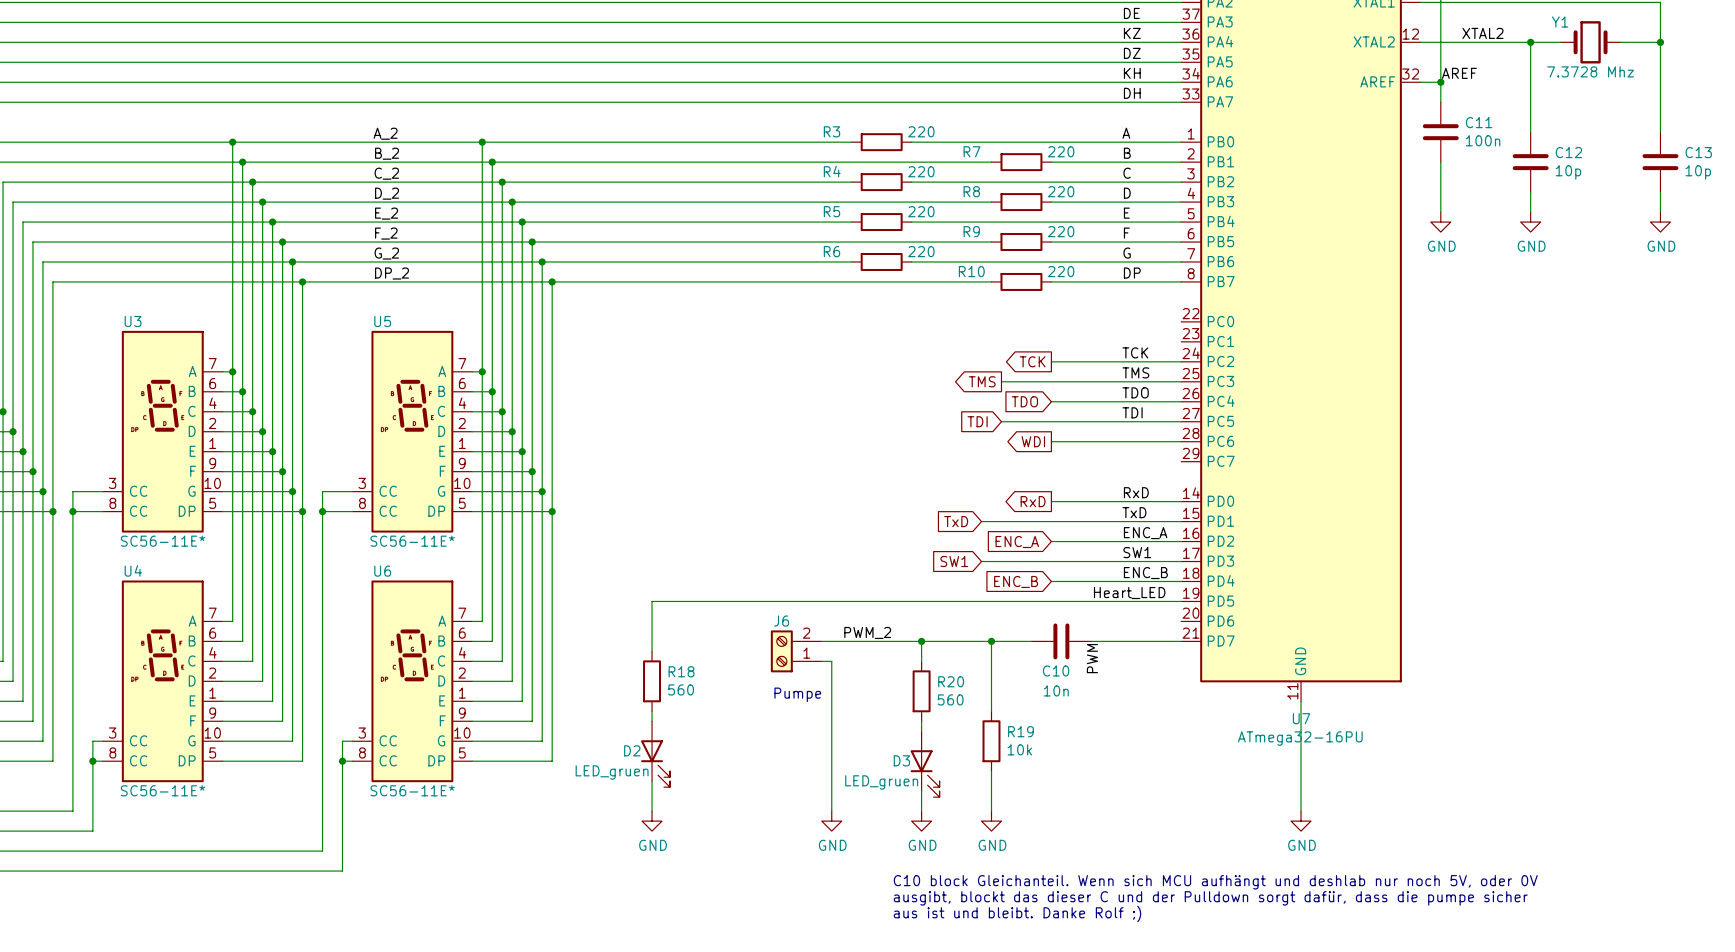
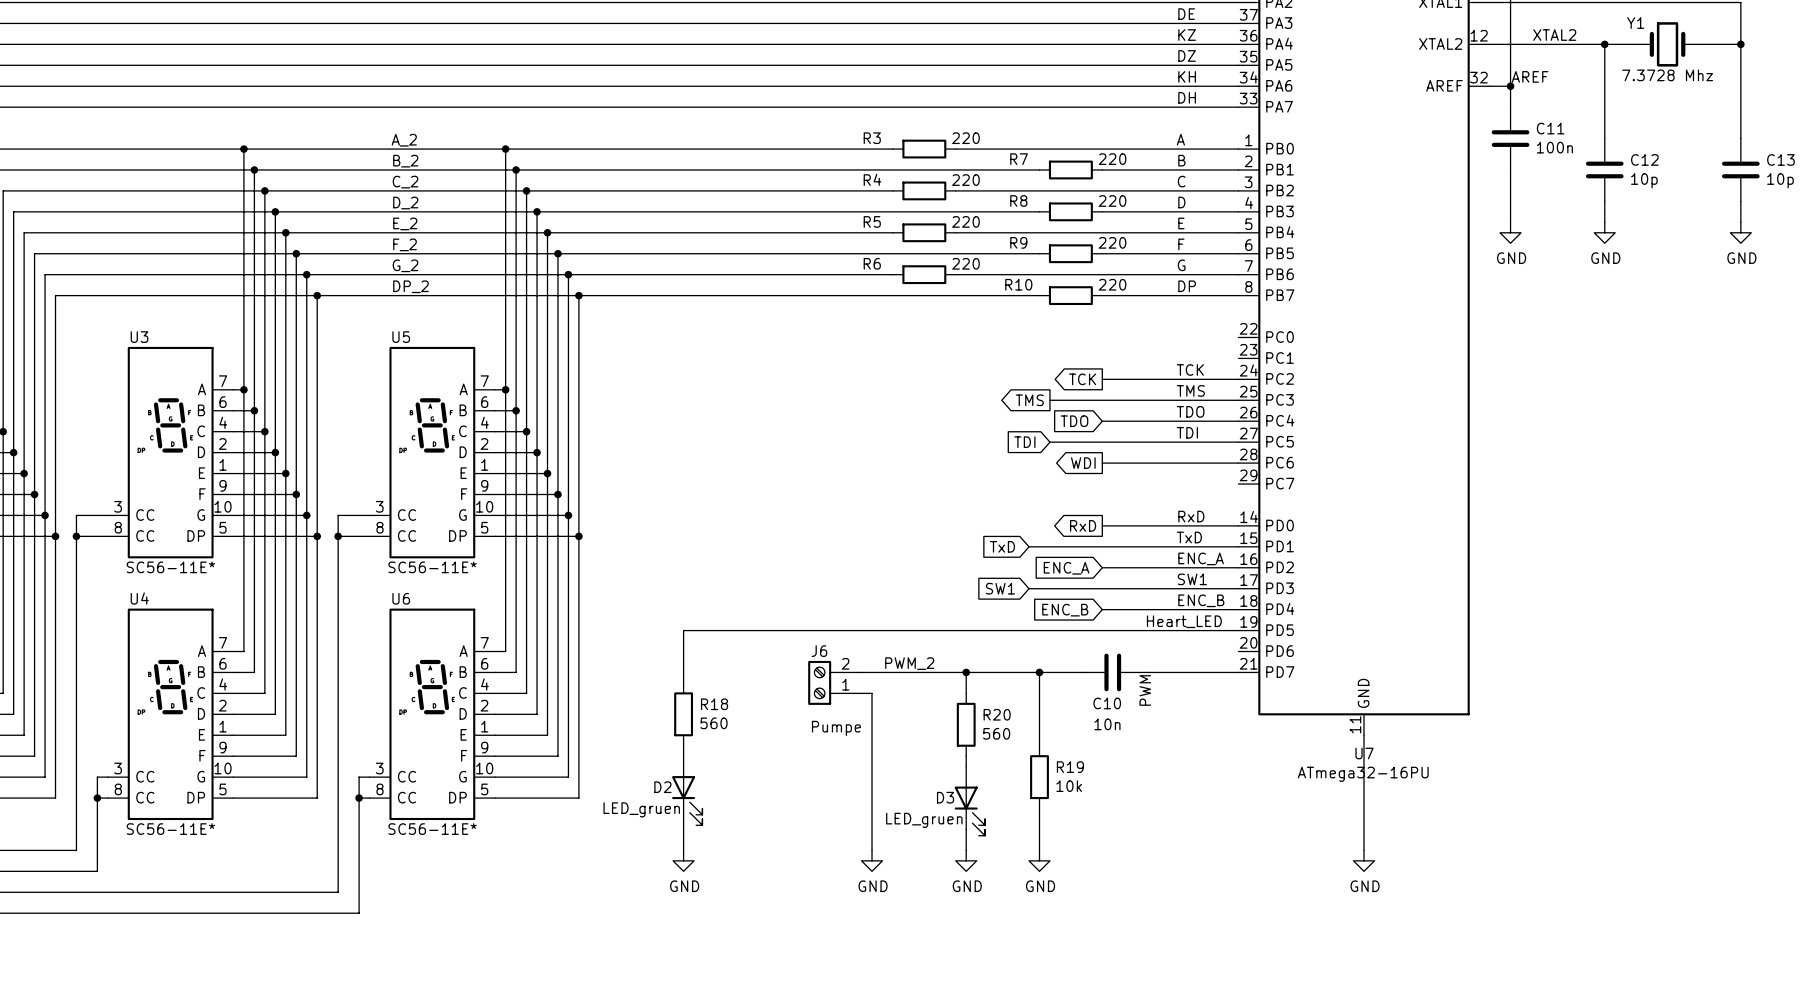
text: C10 block Gleichanteil. Wenn sich MCU aufhängt und deshlab nur noch 5V, oder 0V (1215, 882) -> none
text: ausgibt, blockt das dieser C und der Pulldown sorgt dafür, dass die pumpe sicher (1210, 898) -> none
text: aus ist und bleibt. Danke Rolf ;) (1017, 913) -> none

